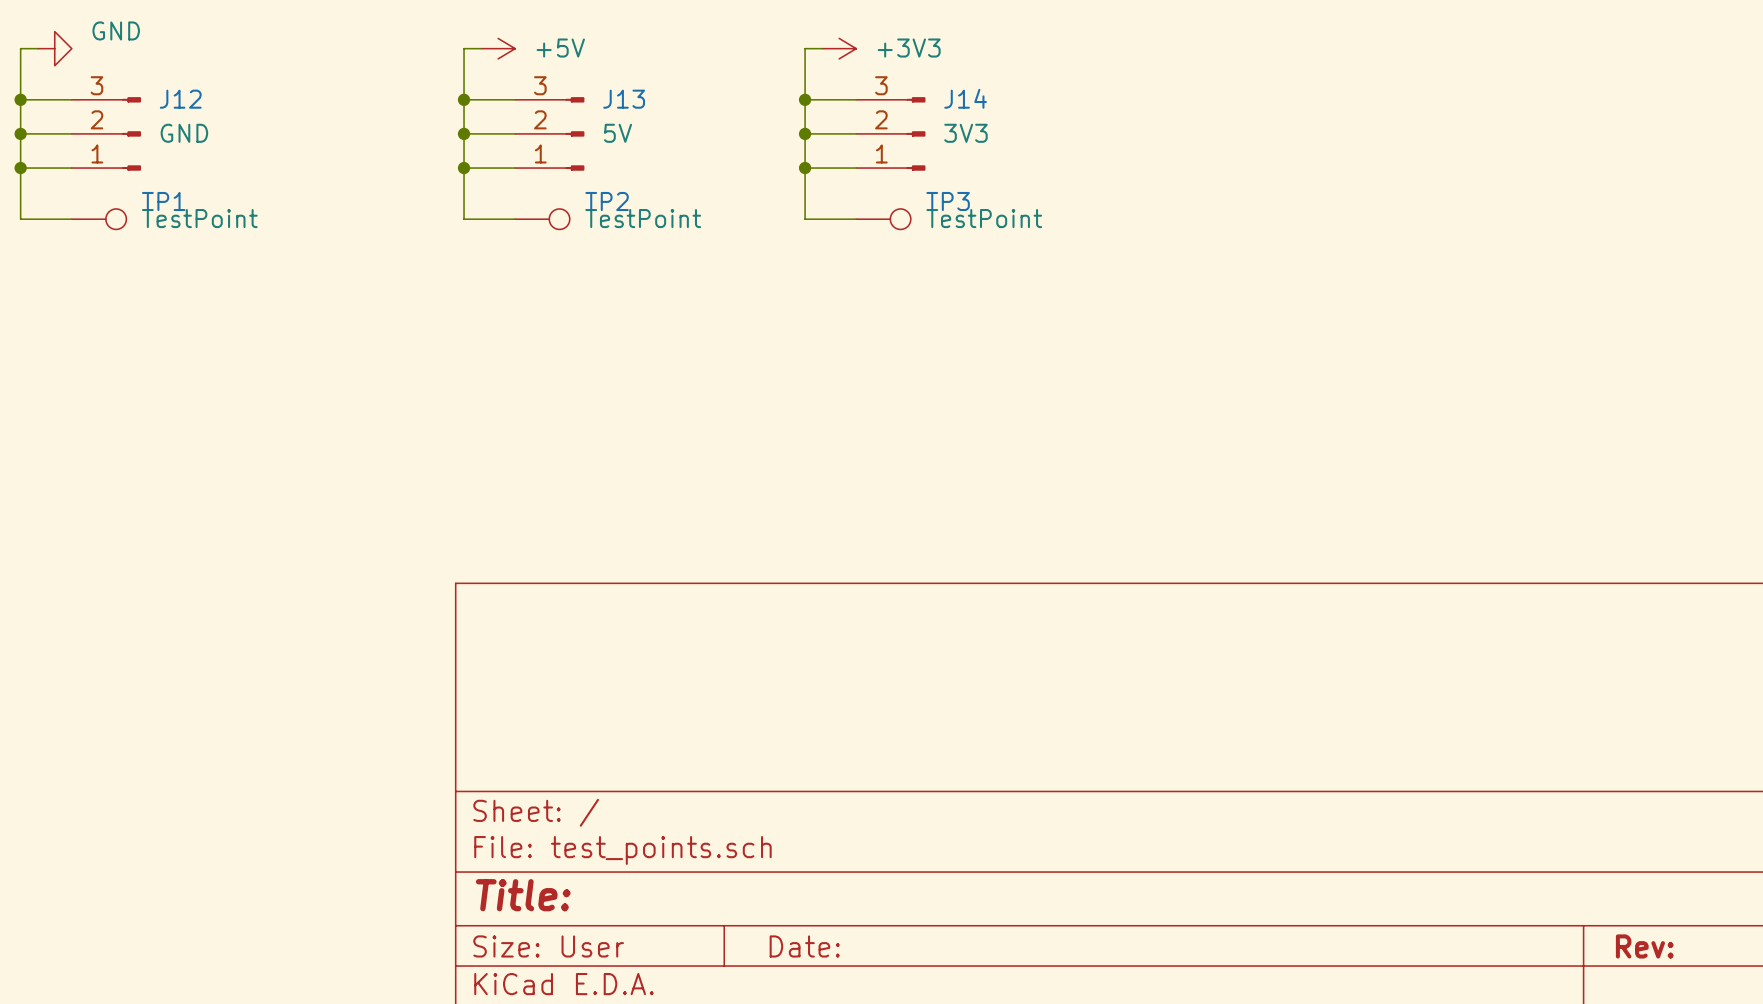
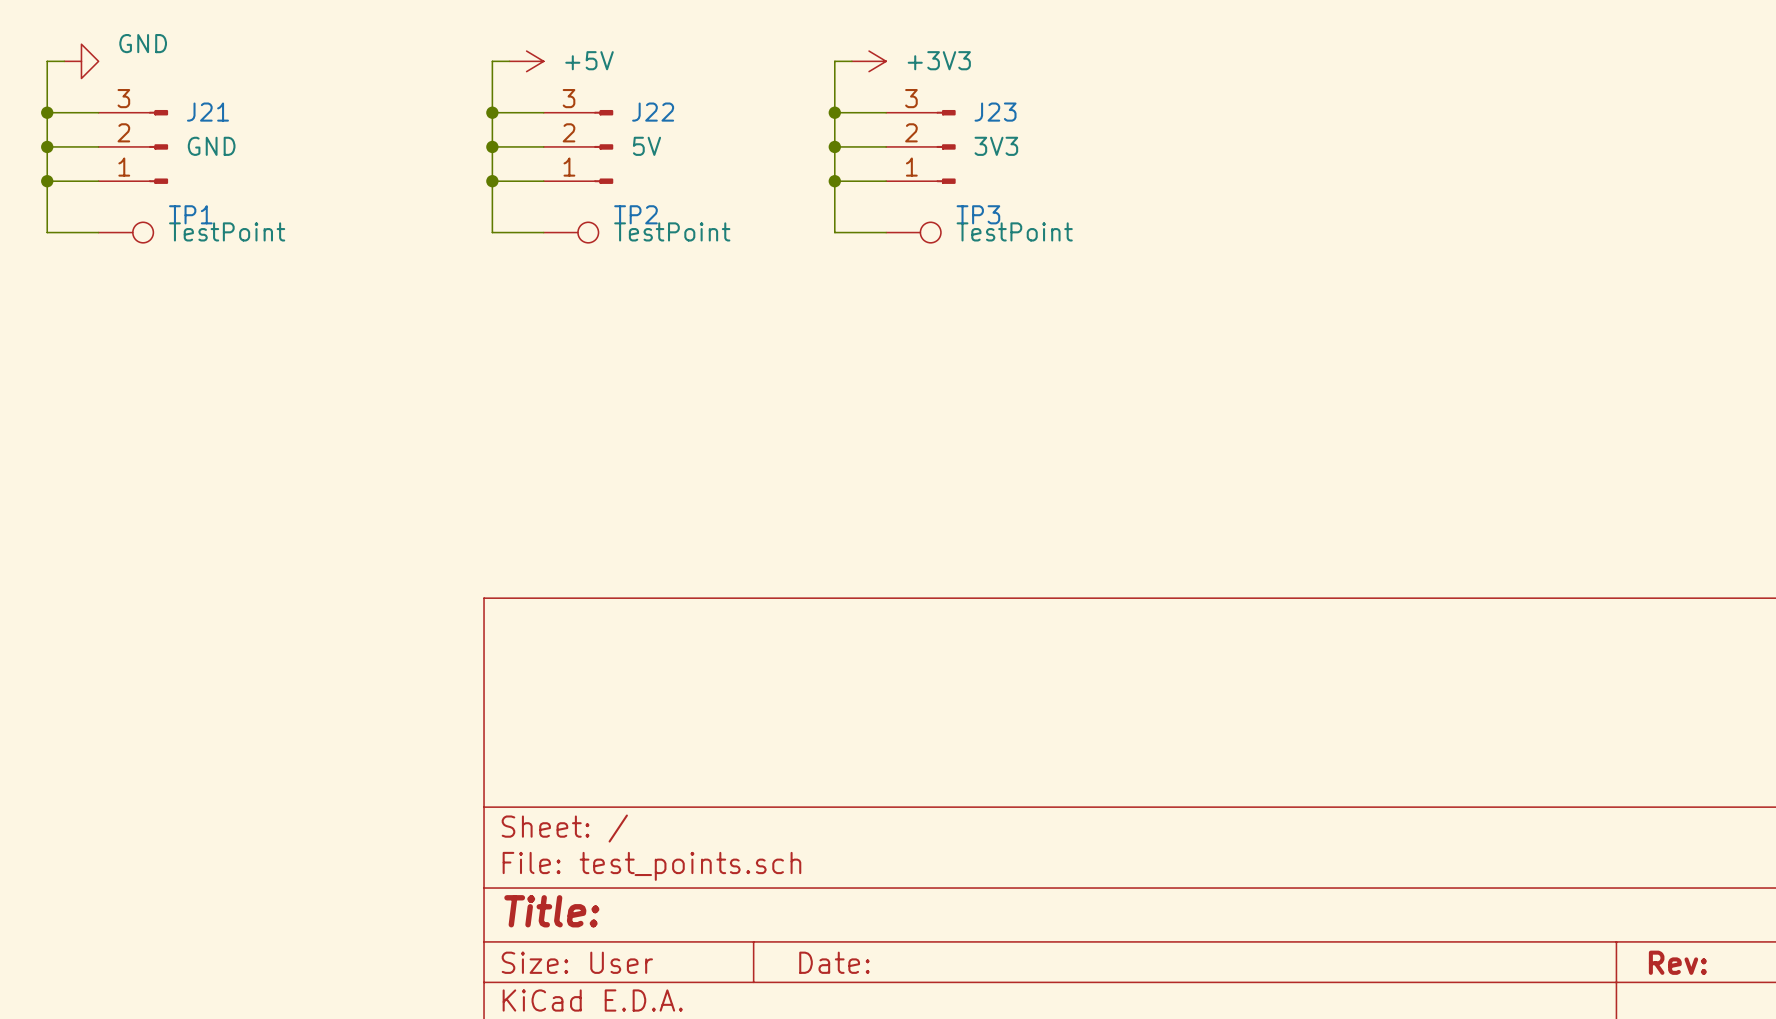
J14 name: J14 (965, 98) -> J23 (995, 112)
J12 name: J12 (180, 99) -> J21 (207, 112)
J13 name: J13 (624, 99) -> J22 (653, 112)

